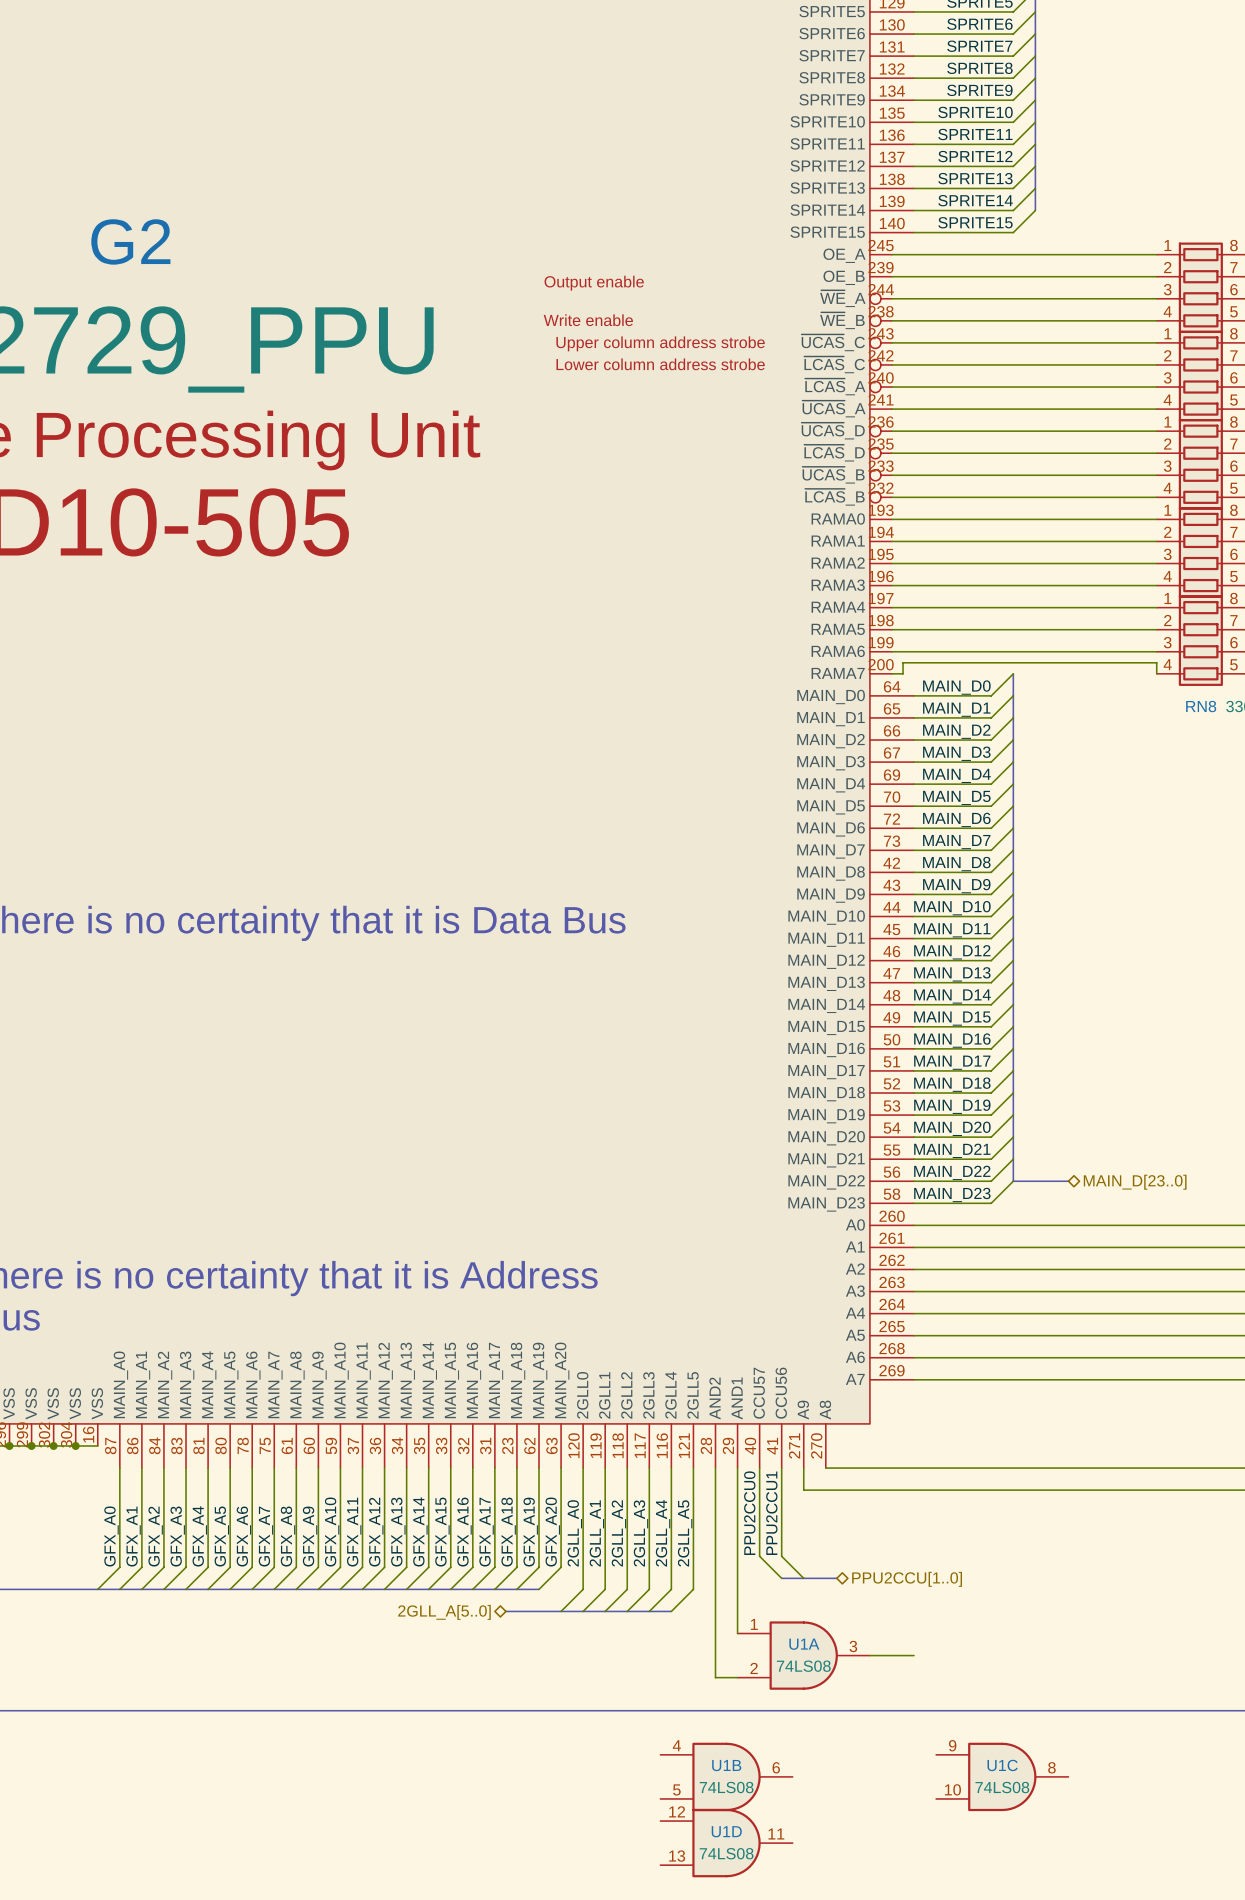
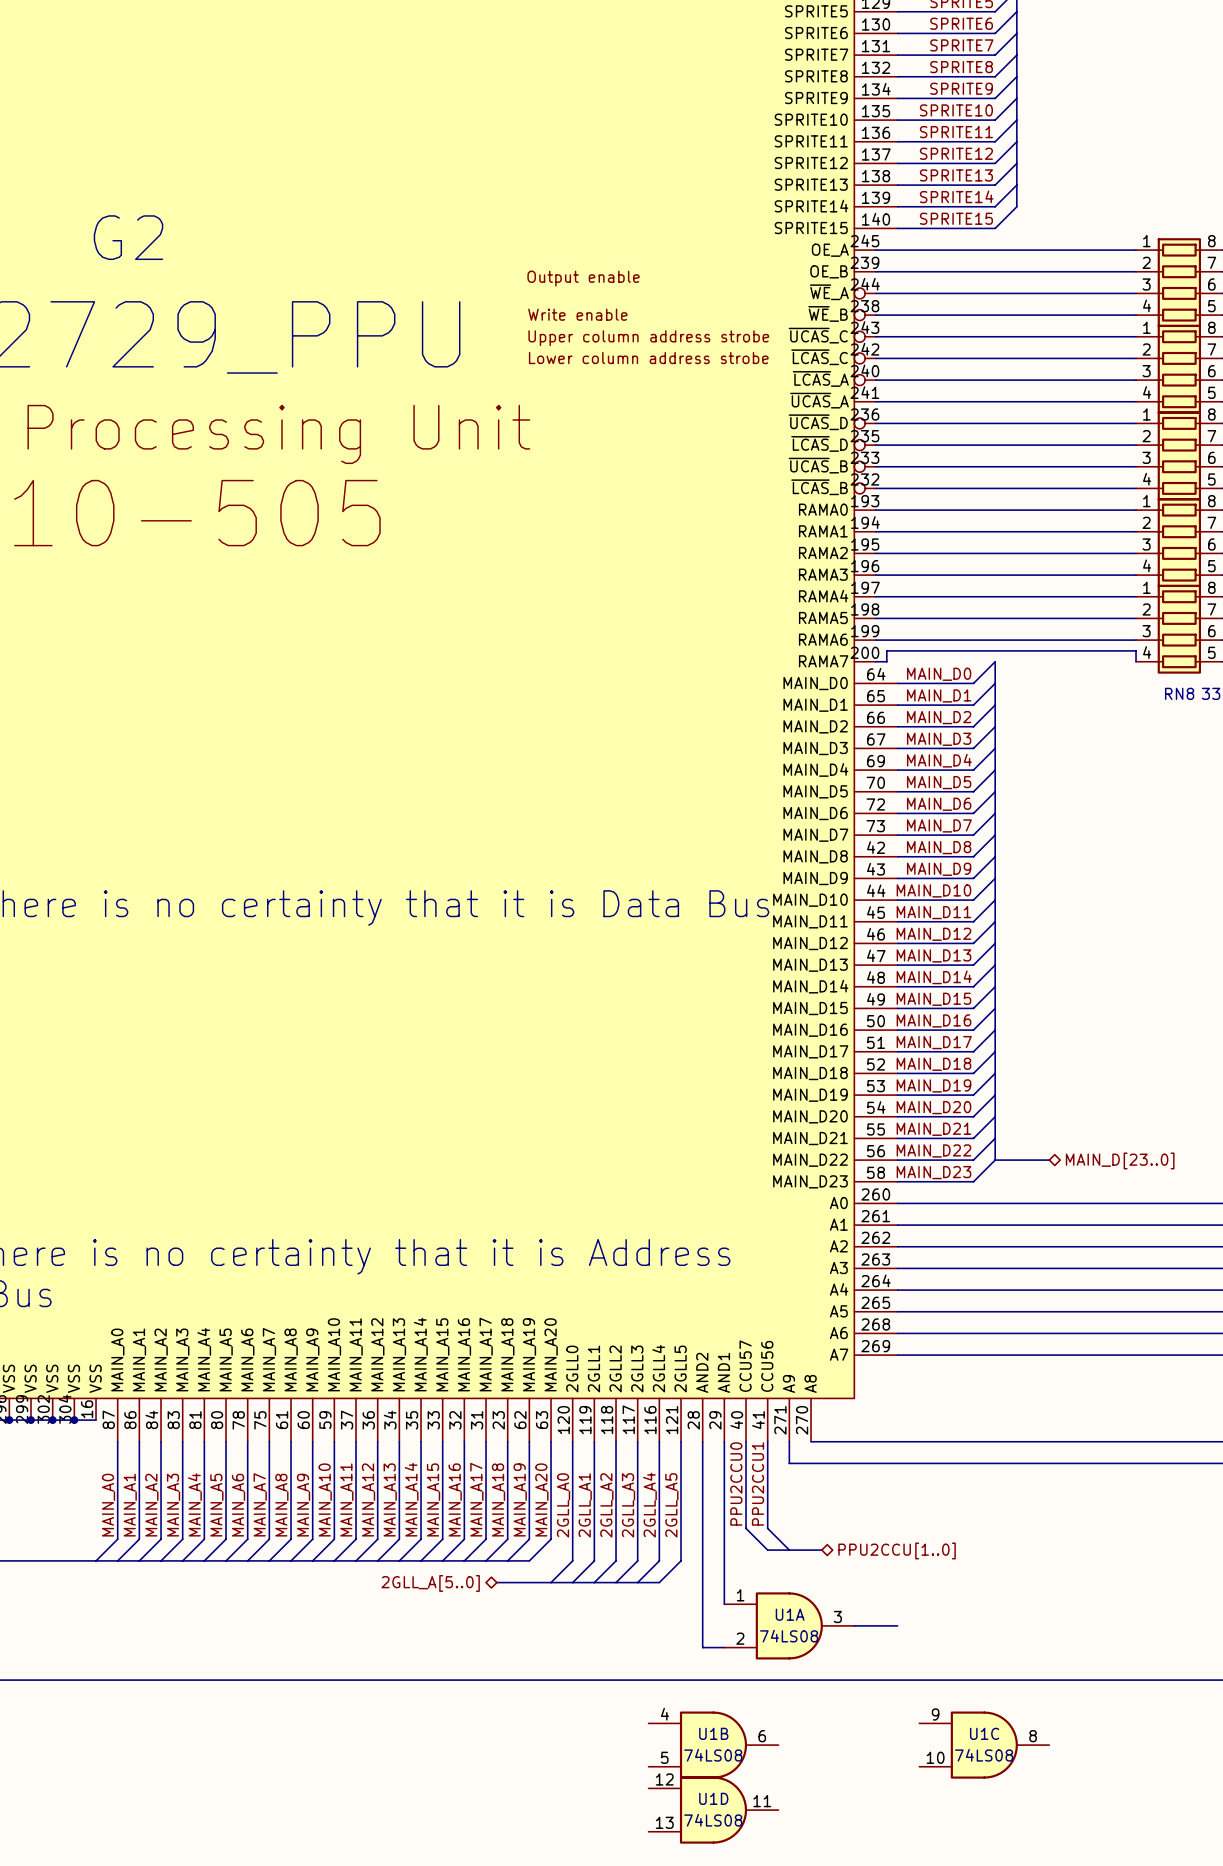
label: GFX_A14 (420, 1531) -> MAIN_A14 (411, 1499)
label: GFX_A10 (332, 1532) -> MAIN_A10 (325, 1499)
label: GFX_A11 (354, 1532) -> MAIN_A11 (346, 1499)
label: GFX_A12 (376, 1532) -> MAIN_A12 (368, 1499)
label: GFX_A13 (398, 1532) -> MAIN_A13 (390, 1499)
label: GFX_A15 (442, 1532) -> MAIN_A15 (433, 1499)
label: GFX_A16 (464, 1532) -> MAIN_A16 (455, 1499)
label: GFX_A17 (486, 1532) -> MAIN_A17 (476, 1499)
label: GFX_A18 (508, 1532) -> MAIN_A18 (498, 1499)
label: GFX_A19 (530, 1532) -> MAIN_A19 (520, 1499)
label: GFX_A20 (552, 1532) -> MAIN_A20 (541, 1499)
label: GFX_A0 (111, 1536) -> MAIN_A0 (108, 1505)
label: GFX_A1 (133, 1536) -> MAIN_A1 (130, 1505)
label: GFX_A2 (155, 1536) -> MAIN_A2 (151, 1505)
label: GFX_A3 (177, 1536) -> MAIN_A3 (173, 1505)
label: GFX_A4 (199, 1536) -> MAIN_A4 (194, 1504)
label: GFX_A5 (221, 1536) -> MAIN_A5 (216, 1505)
label: GFX_A6 (243, 1536) -> MAIN_A6 (238, 1505)
label: GFX_A7 (265, 1536) -> MAIN_A7 (260, 1504)
label: GFX_A8 (287, 1536) -> MAIN_A8 (281, 1505)
label: GFX_A9 (310, 1536) -> MAIN_A9 (303, 1505)

